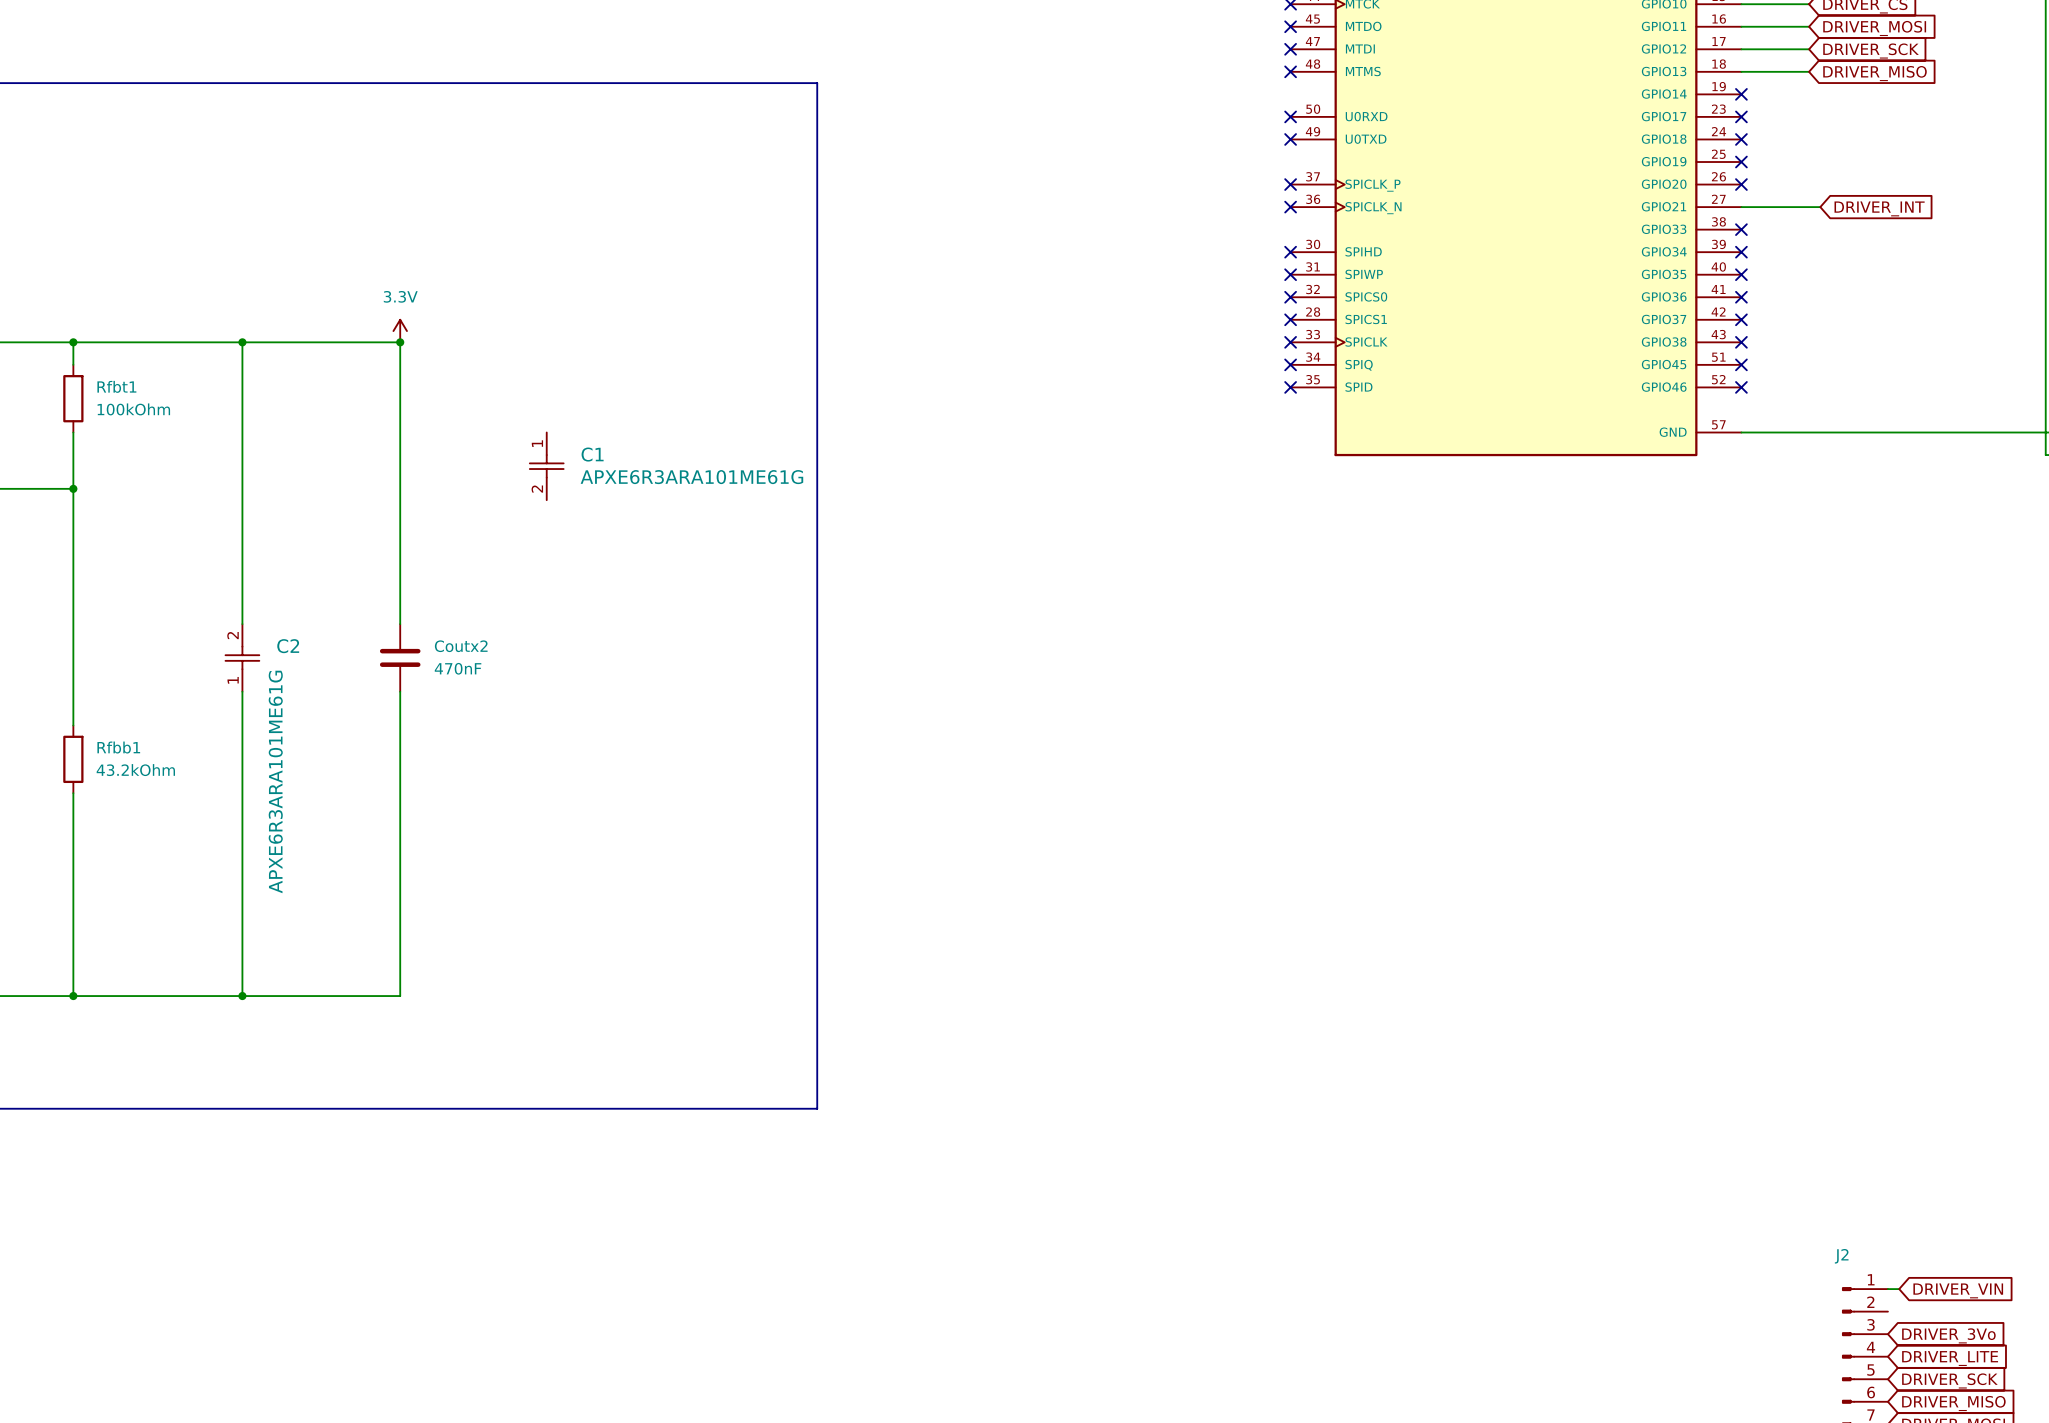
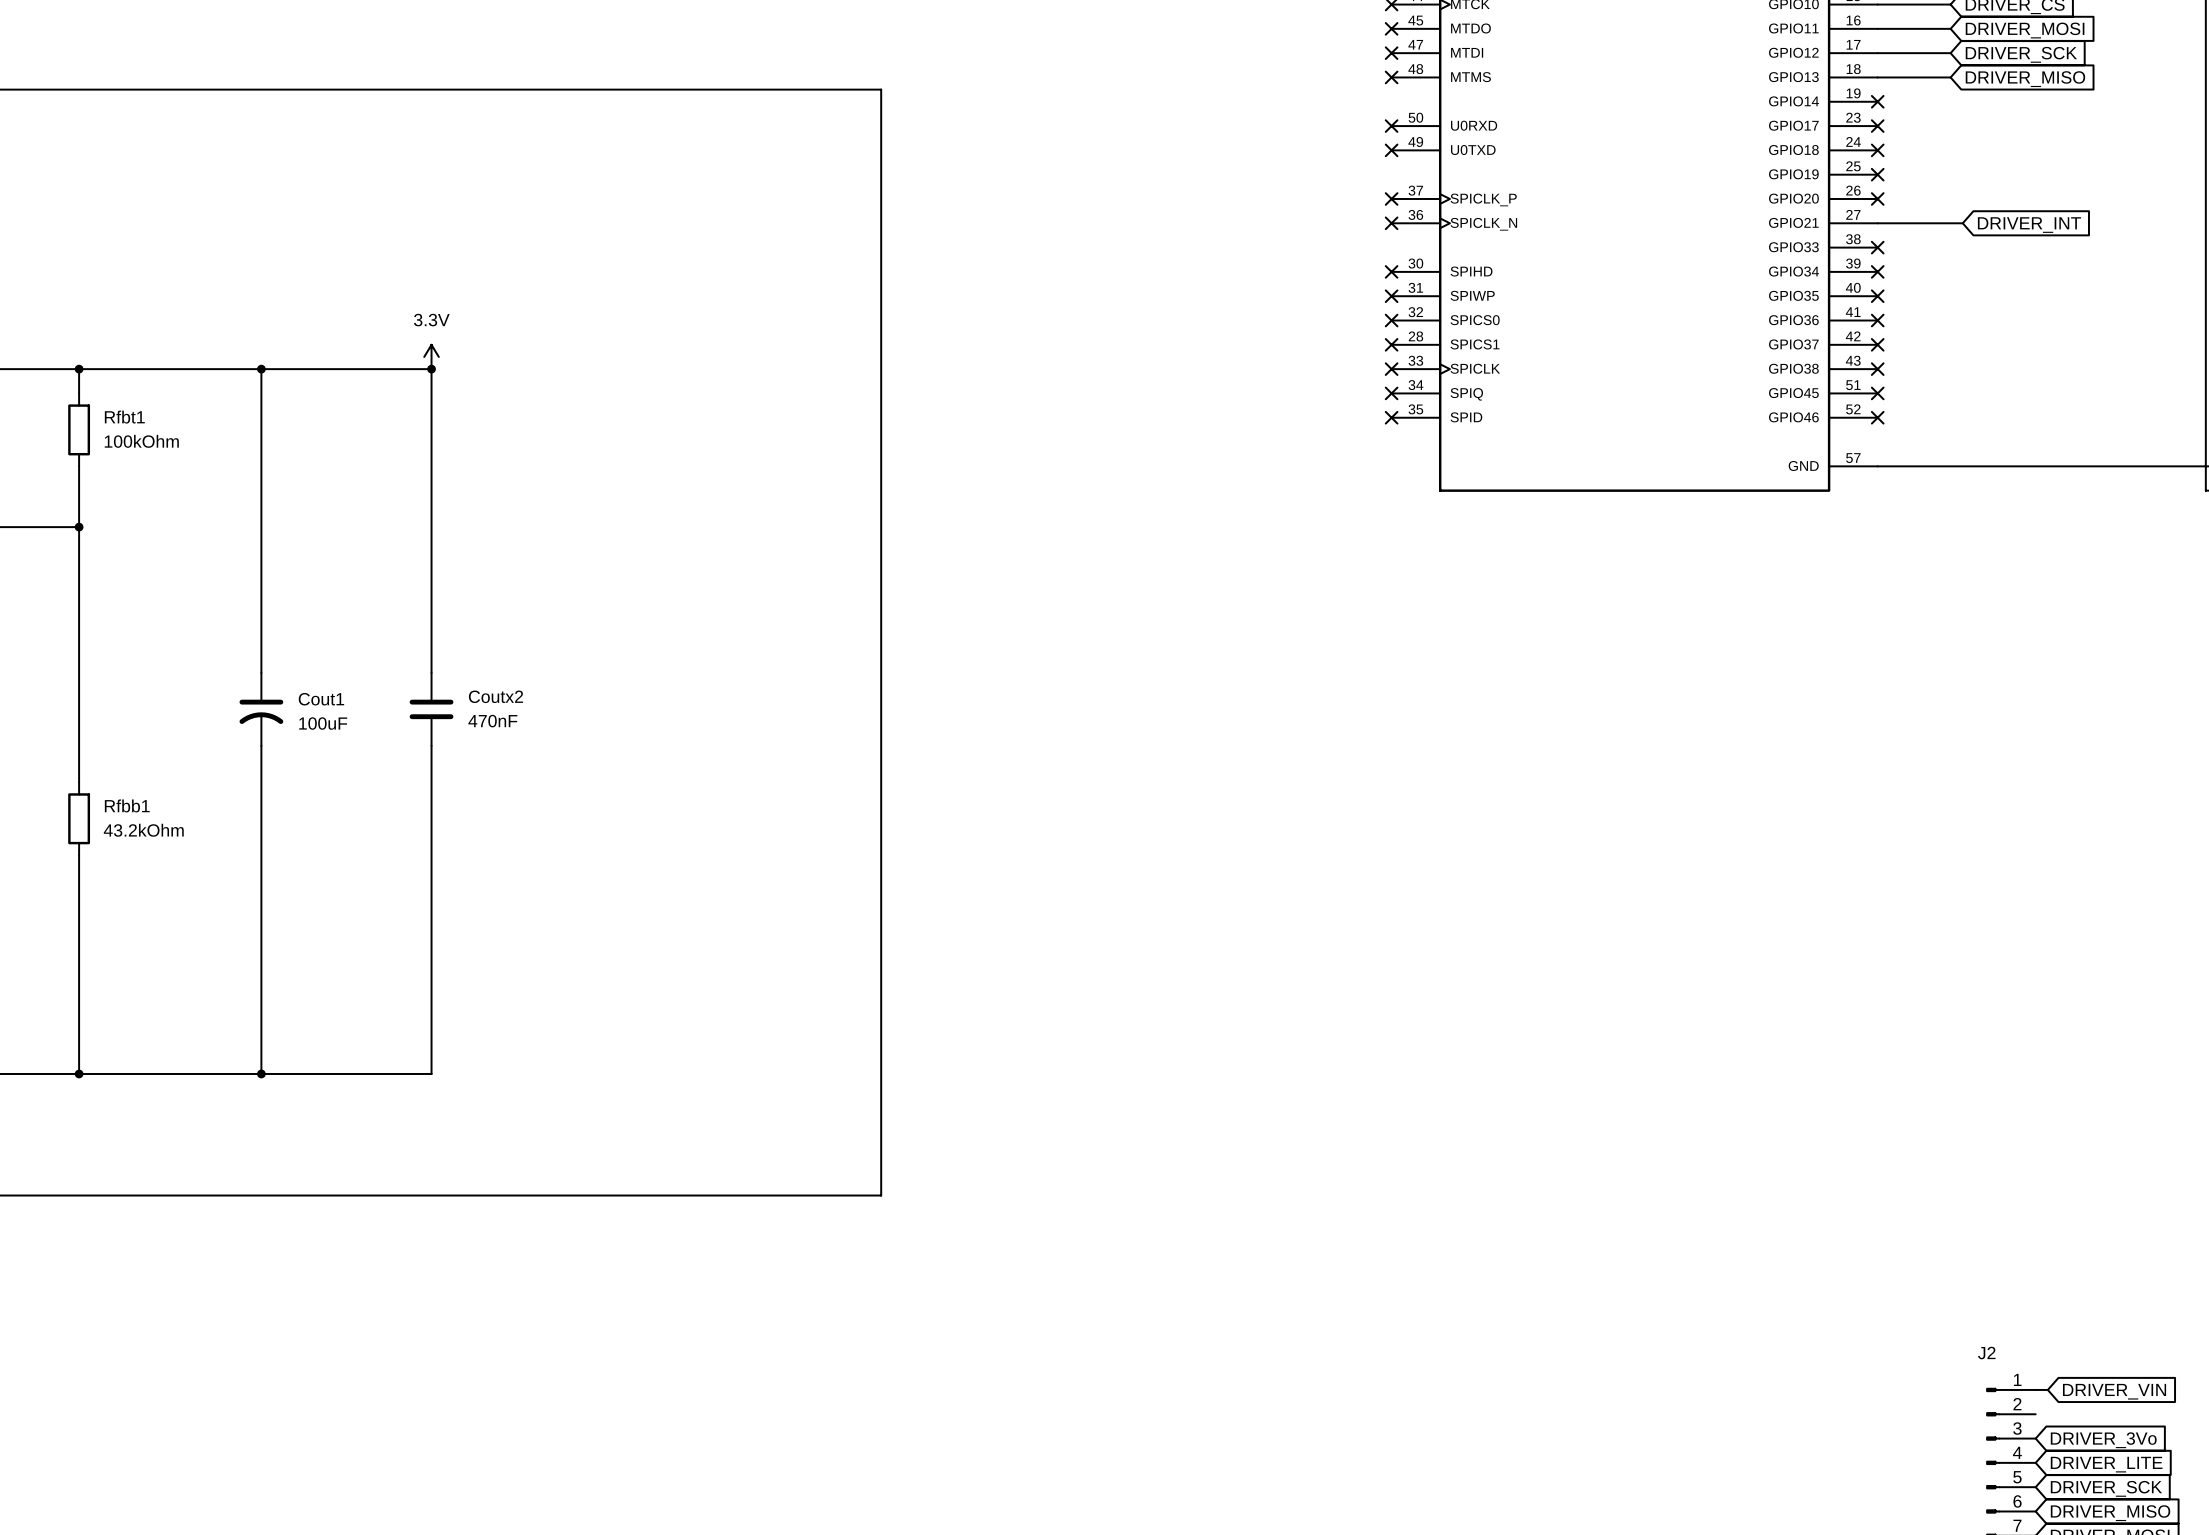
C1: APXE6R3ARA101ME61G (546, 466) -> none
C2: APXE6R3ARA101ME61G (242, 657) -> none
Cout1: none -> 100uF (261, 709)

